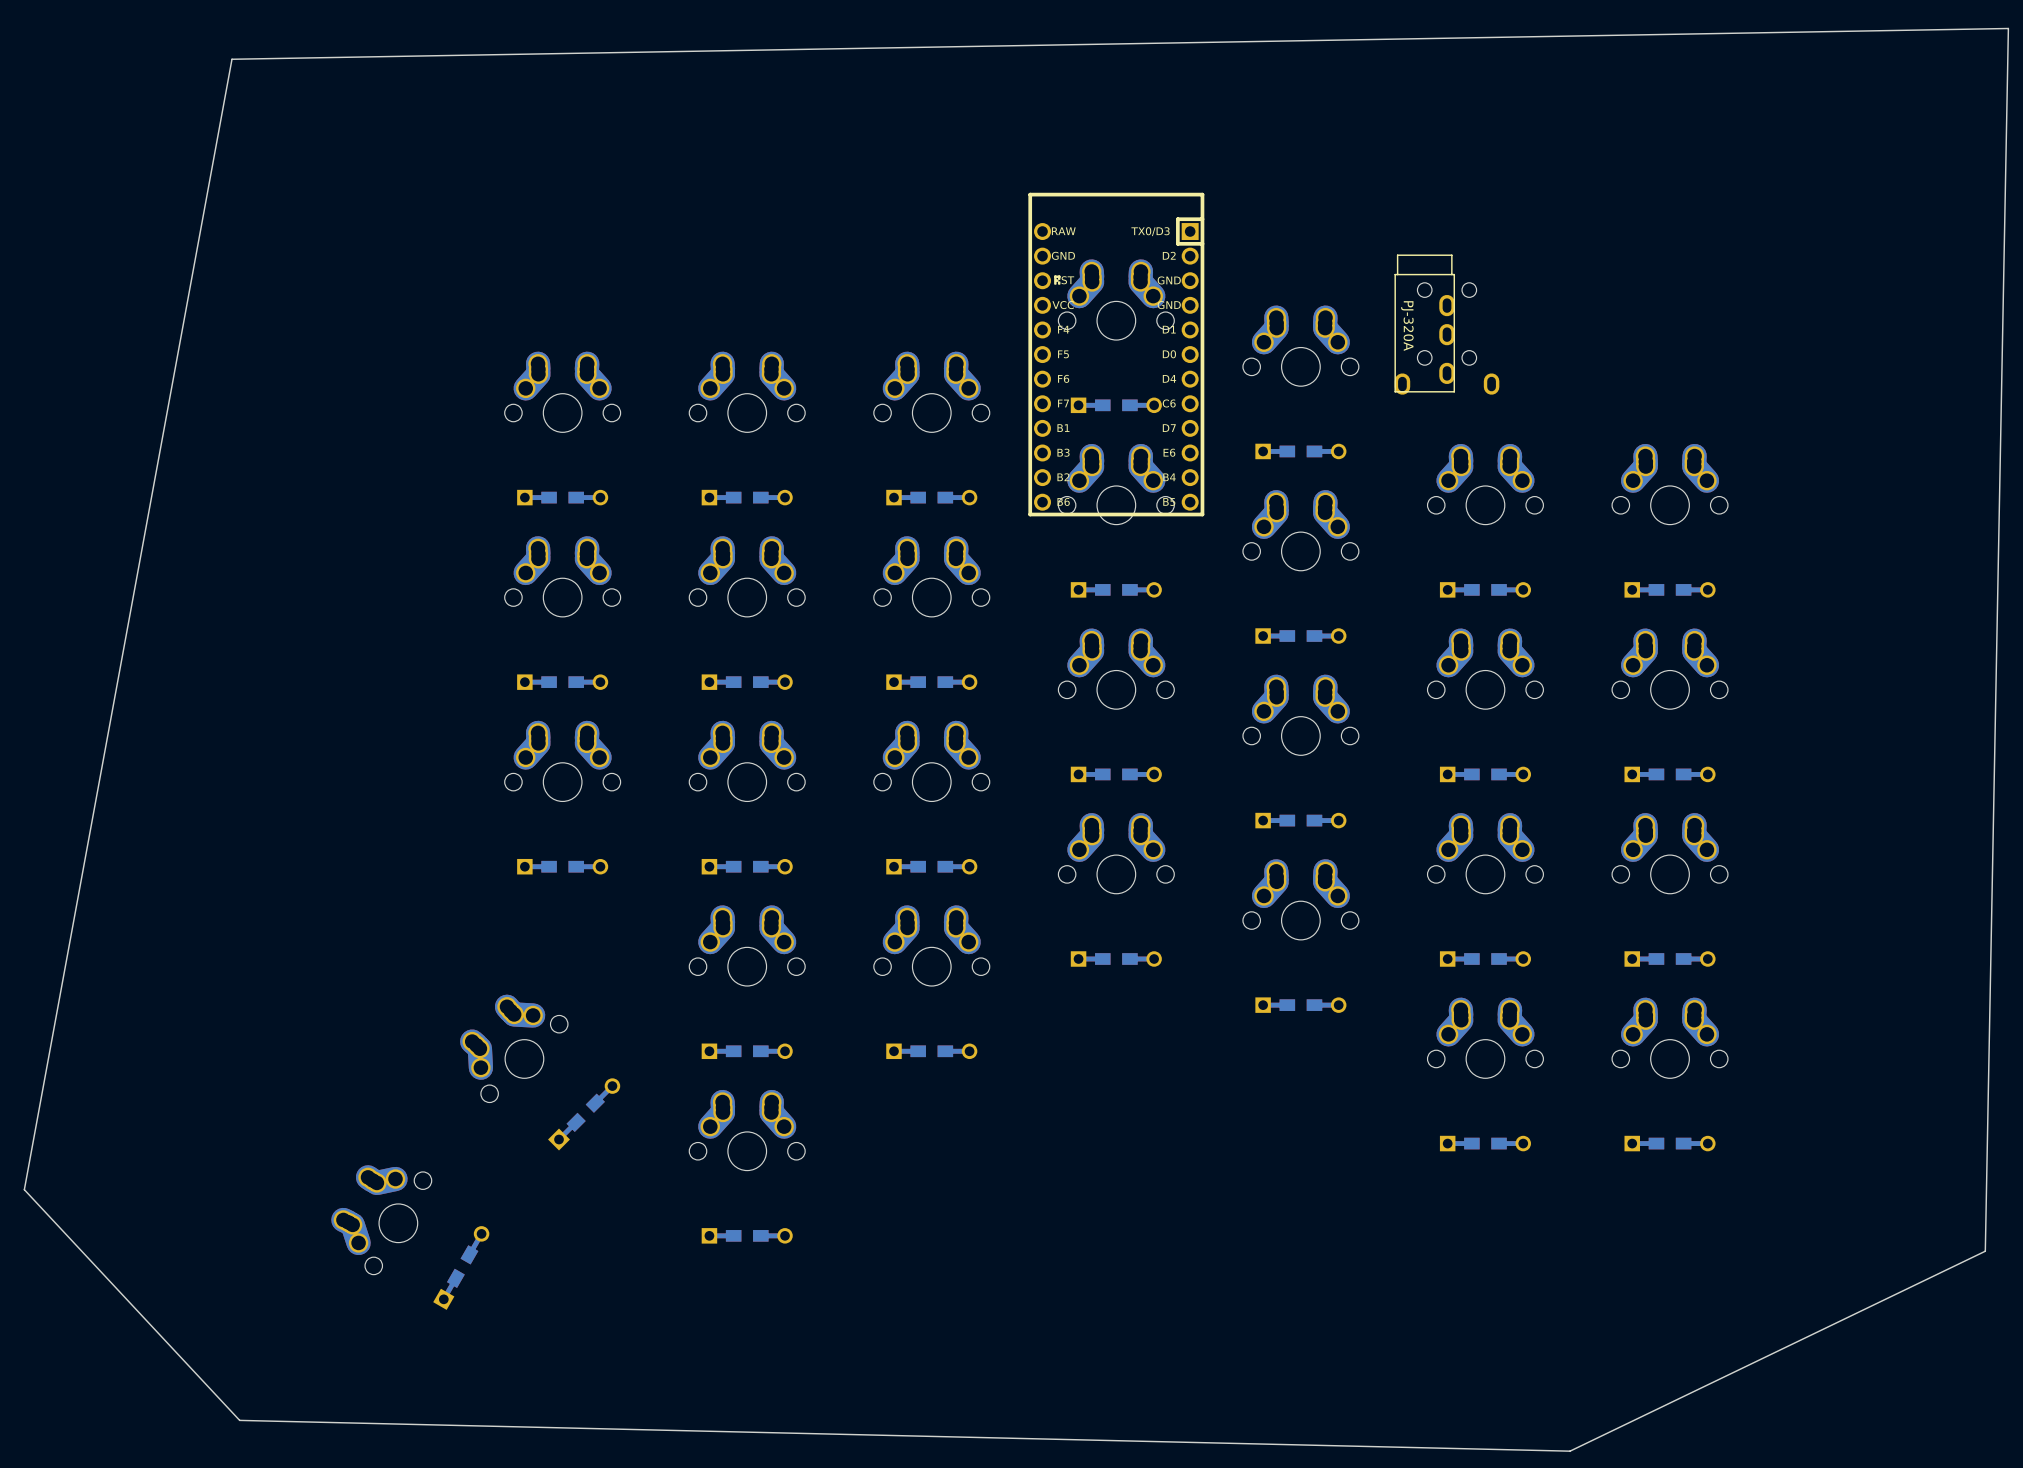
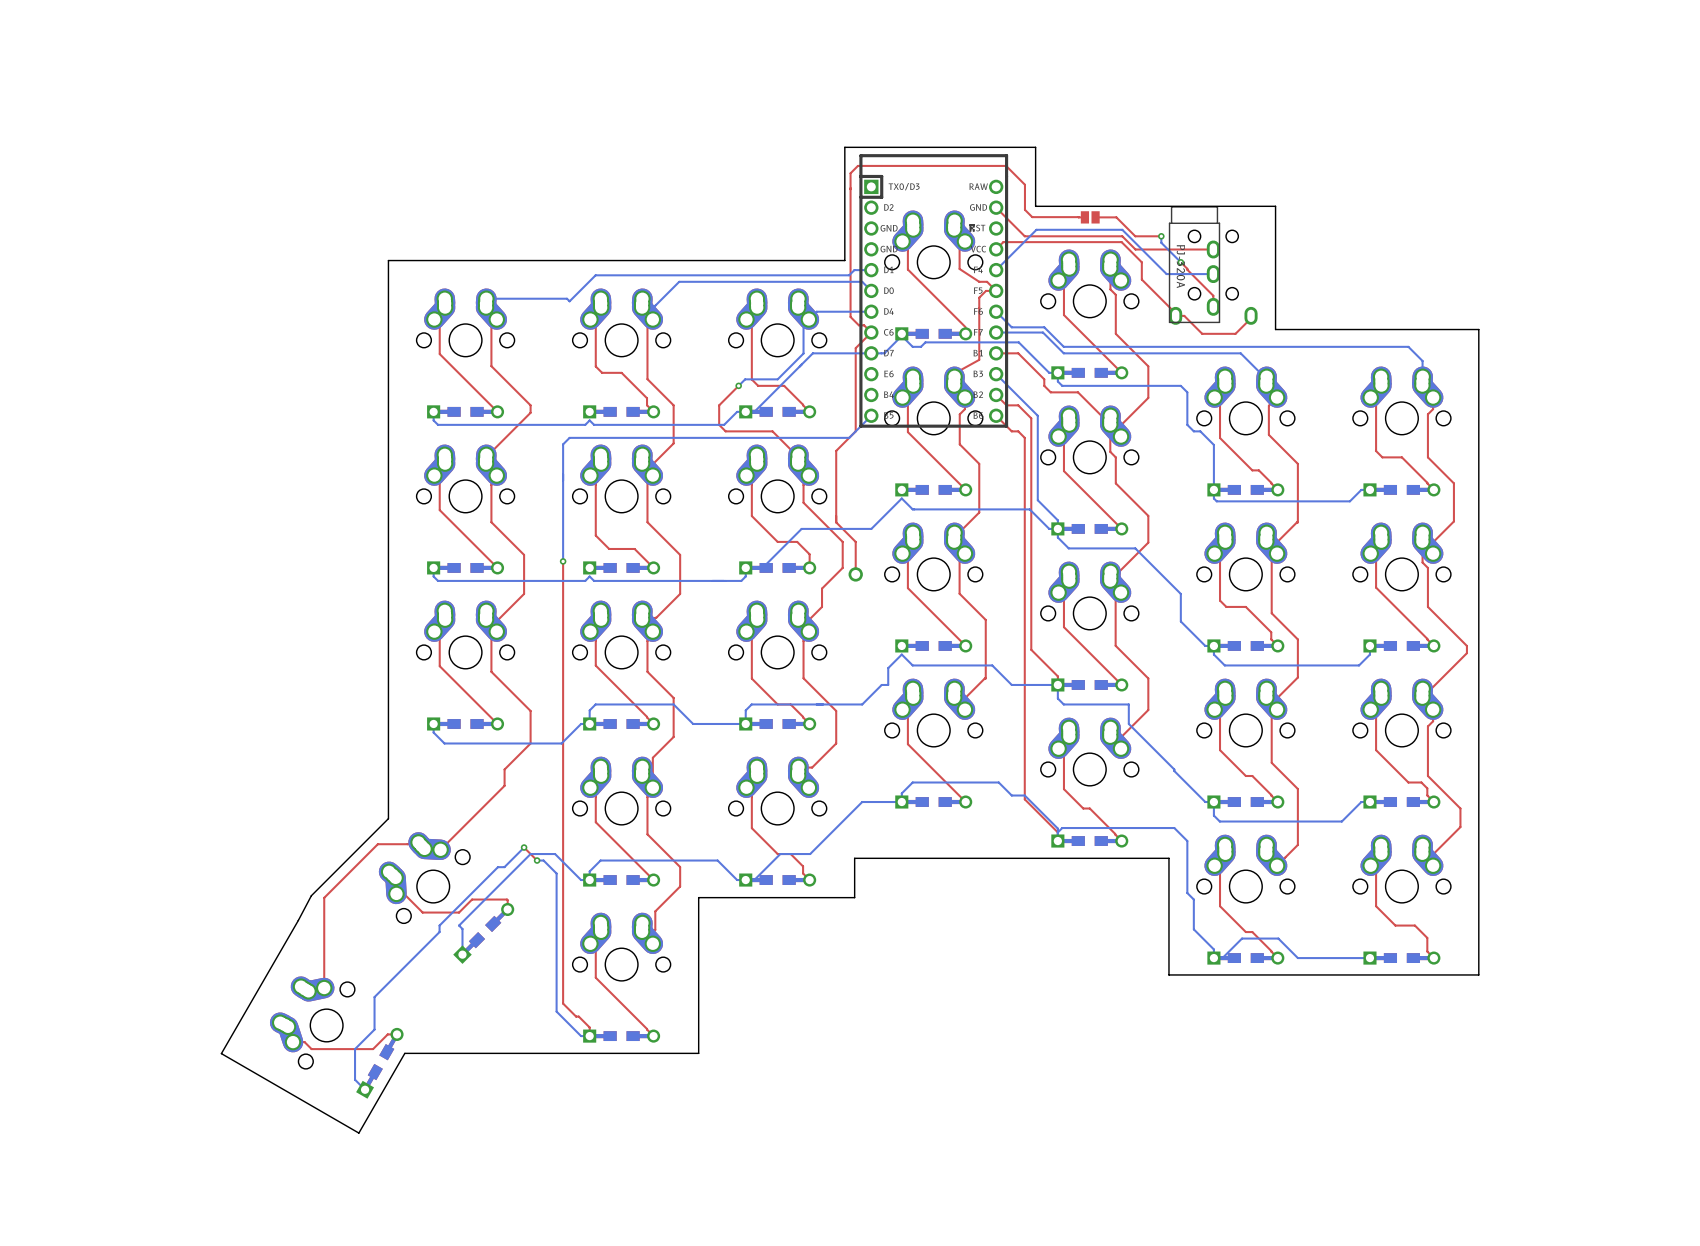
board edge: (2008, 28) (231, 59) (24, 1189) (239, 1420) (1570, 1451) (1985, 1251) (2008, 28) -> (404, 1053) (698, 1053) (698, 897) (854, 897) (854, 858) (1168, 858) (1168, 974) (1478, 974) (1478, 329) (1275, 329) (1275, 206) (1035, 206) (1035, 147) (844, 147) (844, 260) (388, 260) (388, 818) (311, 895) (221, 1053) (358, 1133) (404, 1053)
top track: none -> (996, 207) (1024, 236) (1122, 236) (1135, 249) (1213, 249)
top track: none -> (1084, 217) (1032, 217) (1024, 209) (1024, 184) (1006, 165) (857, 165) (850, 173) (850, 316) (858, 325) (864, 325) (871, 332) (855, 348) (855, 431) (836, 450) (836, 522) (855, 541) (855, 574)
part: none -> (1090, 217)
top track: none -> (1095, 217) (1116, 217) (1135, 236) (1161, 236)
top track: none -> (907, 235) (907, 269) (965, 327)
top track: none -> (959, 235) (959, 268) (979, 281) (987, 281) (996, 290) (986, 290) (979, 297) (979, 359) (946, 378) (959, 391)
bottom track: none -> (1161, 236) (1161, 242) (1180, 262)
via: none -> (1161, 236)
top track: none -> (996, 249) (1003, 242) (1121, 242) (1141, 262) (1141, 279) (1175, 313) (1175, 318)
top track: none -> (1110, 262) (1110, 289) (1115, 294) (1115, 333) (1148, 366) (1148, 397) (1115, 430)
top track: none -> (1180, 262) (1213, 295) (1213, 306)
via: none -> (1180, 262)
bottom track: none -> (871, 270) (854, 270) (849, 275) (595, 275) (569, 301) (567, 298) (494, 298) (486, 307)
bottom track: none -> (996, 270) (1036, 229) (1122, 229) (1166, 274) (1213, 274)
top track: none -> (1063, 274) (1063, 315) (1121, 372)
bottom track: none -> (871, 290) (862, 281) (679, 281) (647, 313)
part side: top (1116, 354) -> bottom (933, 290)
bottom track: none -> (871, 311) (816, 311) (808, 319)
bottom track: none -> (996, 311) (1011, 327) (1044, 327) (1063, 346) (1408, 346) (1422, 360) (1422, 379)
top track: none -> (439, 313) (439, 354) (497, 411)
top track: none -> (491, 313) (491, 366) (530, 405) (530, 412) (486, 457)
top track: none -> (595, 313) (595, 366) (602, 372) (621, 372) (647, 398) (647, 405) (653, 411)
top track: none -> (647, 313) (647, 379) (673, 405) (673, 443) (647, 469) (647, 522) (680, 554) (680, 593) (647, 625) (647, 671) (673, 697) (673, 736) (652, 757) (652, 787)
top track: none -> (751, 313) (751, 379) (758, 385) (784, 385) (809, 411)
bottom track: none -> (803, 313) (803, 353) (777, 379) (745, 379) (738, 385)
top track: none -> (1251, 315) (1251, 318) (1235, 333) (1202, 333) (1184, 315) (1175, 315)
bottom track: none -> (996, 332) (1042, 332) (1063, 353) (1240, 353) (1266, 379)
top track: none -> (996, 353) (1018, 353) (1044, 379) (1044, 385) (1050, 392) (1078, 392) (1110, 424) (1110, 451) (1115, 457) (1115, 483) (1148, 515) (1148, 542) (1110, 580)
bottom track: none -> (996, 374) (1037, 415) (1037, 500) (1057, 520) (1057, 537) (1068, 548) (1135, 548) (1180, 593) (1180, 621) (1205, 645) (1213, 645) (1213, 654) (1224, 665) (1359, 665) (1369, 654) (1369, 645)
top track: none -> (738, 385) (719, 405) (719, 424) (725, 431) (772, 431) (798, 457)
via: none -> (738, 385)
top track: none -> (907, 391) (907, 432) (965, 489)
top track: none -> (1220, 391) (1220, 438) (1252, 470) (1258, 470) (1277, 489)
top track: none -> (1376, 391) (1375, 450) (1382, 457) (1401, 457) (1433, 489)
top track: none -> (996, 394) (1006, 405) (1018, 405) (1031, 418) (1031, 649) (1057, 676) (1057, 684)
top track: none -> (964, 397) (964, 409) (959, 414) (959, 444) (979, 463) (979, 512) (954, 537)
top track: none -> (1277, 397) (1268, 405) (1268, 434) (1297, 463) (1297, 522) (1271, 547) (1271, 613) (1297, 639) (1297, 677) (1271, 703) (1271, 762) (1297, 789) (1297, 844) (1277, 865)
top track: none -> (1433, 397) (1433, 409) (1427, 414) (1427, 457) (1453, 483) (1453, 521) (1427, 547)
bottom track: none -> (433, 411) (433, 420) (438, 424) (585, 424) (589, 420) (594, 424) (724, 424) (737, 411) (754, 411) (812, 353) (884, 353) (901, 335) (912, 346) (920, 346) (925, 342) (1018, 342) (1049, 372) (1057, 372) (1057, 381) (1062, 385) (1180, 385) (1187, 392) (1187, 424) (1193, 431) (1200, 431) (1213, 444) (1213, 498) (1216, 501) (1349, 501) (1361, 489) (1369, 489)
bottom track: none -> (871, 415) (849, 437) (569, 437) (563, 444) (563, 561)
top track: none -> (996, 415) (1011, 431) (1018, 431) (1024, 437) (1024, 799) (1057, 832) (1057, 841)
top track: none -> (1063, 430) (1063, 471) (1121, 528)
top track: none -> (439, 469) (439, 510) (497, 567)
top track: none -> (491, 469) (491, 522) (524, 554) (524, 593) (498, 619) (486, 619)
top track: none -> (595, 469) (595, 535) (609, 548) (634, 548) (653, 567)
top track: none -> (751, 469) (751, 516) (777, 541) (797, 541) (809, 554) (809, 567)
top track: none -> (803, 469) (803, 502) (842, 541) (842, 567) (822, 588) (822, 606) (808, 620) (808, 631)
bottom track: none -> (1057, 528) (1049, 528) (1029, 509) (912, 509) (901, 498) (871, 528) (801, 528) (762, 567) (745, 567) (745, 576) (741, 580) (594, 580) (589, 576) (585, 580) (438, 580) (433, 576) (433, 567)
top track: none -> (1422, 535) (1422, 562) (1427, 567) (1427, 606) (1466, 645) (1466, 653) (1422, 697)
top track: none -> (907, 547) (907, 588) (965, 645)
top track: none -> (959, 547) (959, 593) (985, 619) (985, 678) (959, 703)
top track: none -> (1220, 547) (1220, 600) (1226, 606) (1245, 606) (1271, 632) (1271, 639) (1277, 645)
top track: none -> (1376, 547) (1376, 587) (1433, 645)
top track: none -> (563, 561) (563, 1003) (589, 1027) (589, 1036)
via: none -> (563, 561)
part: none -> (855, 574)
top track: none -> (1063, 586) (1063, 627) (1121, 684)
top track: none -> (1115, 586) (1115, 645) (1148, 678) (1148, 710) (1115, 742)
top track: none -> (439, 625) (439, 666) (497, 723)
top track: none -> (491, 625) (491, 671) (530, 710) (530, 743) (504, 769) (504, 785) (440, 849)
top track: none -> (595, 625) (595, 665) (653, 723)
top track: none -> (751, 625) (751, 678) (777, 704) (790, 704) (809, 723)
top track: none -> (803, 625) (803, 678) (836, 710) (836, 743) (812, 767) (806, 767) (798, 775)
top track: none -> (907, 703) (907, 744) (965, 802)
top track: none -> (1220, 703) (1220, 750) (1245, 776) (1252, 776) (1277, 802)
top track: none -> (1376, 703) (1376, 750) (1408, 782) (1421, 782) (1427, 788) (1427, 795) (1433, 802)
top track: none -> (1433, 709) (1433, 721) (1427, 726) (1427, 776) (1460, 808) (1460, 827) (1427, 859)
bottom track: none -> (433, 723) (433, 732) (444, 743) (561, 743) (581, 723) (589, 723) (589, 710) (595, 704) (673, 704) (693, 723) (745, 723) (745, 710) (751, 704) (862, 704) (881, 684) (888, 684) (888, 668) (901, 654) (912, 665) (992, 665) (1011, 684) (1057, 684) (1057, 698) (1063, 704) (1128, 704) (1128, 723) (1205, 802) (1213, 802) (1213, 815) (1219, 821) (1341, 821) (1361, 802) (1369, 802)
top track: none -> (1063, 742) (1063, 789) (1083, 808) (1089, 808) (1121, 841)
top track: none -> (595, 781) (595, 822) (653, 880)
top track: none -> (647, 781) (647, 834) (680, 867) (680, 886) (655, 911) (655, 929) (647, 937)
top track: none -> (751, 781) (751, 828) (777, 854) (790, 854) (803, 866) (803, 873) (809, 880)
bottom track: none -> (1057, 832) (1062, 828) (1174, 828) (1187, 841) (1187, 893) (1193, 899) (1193, 929) (1213, 949) (1213, 958) (1222, 958) (1242, 938) (1278, 938) (1297, 958) (1369, 958)
bottom track: none -> (1057, 841) (1057, 828) (1024, 795) (1011, 795) (998, 782) (912, 782) (901, 793) (901, 802) (862, 802) (810, 854) (780, 854) (754, 880) (737, 880) (717, 860) (600, 860) (589, 871) (589, 880) (581, 880) (555, 854) (530, 854) (459, 925) (462, 928) (462, 954)
top track: none -> (420, 844) (377, 844) (324, 897) (324, 988)
top track: none -> (524, 847) (537, 860)
bottom track: none -> (524, 847) (504, 867) (497, 867) (439, 925) (439, 932) (374, 997) (374, 1029) (355, 1049) (355, 1079) (365, 1089)
via: none -> (524, 847)
top track: none -> (1220, 859) (1220, 906) (1245, 932) (1252, 932) (1277, 958)
top track: none -> (1376, 859) (1376, 906) (1395, 925) (1414, 925) (1427, 937) (1427, 951) (1433, 958)
bottom track: none -> (537, 860) (543, 860) (556, 873) (556, 1011) (581, 1036) (589, 1036)
via: none -> (537, 860)
top track: none -> (396, 885) (422, 912) (459, 912) (472, 899) (507, 899) (507, 909) (493, 923)
top track: none -> (595, 937) (595, 977) (653, 1036)
top track: none -> (397, 1034) (387, 1034) (373, 1049) (311, 1049) (304, 1042) (293, 1042)

